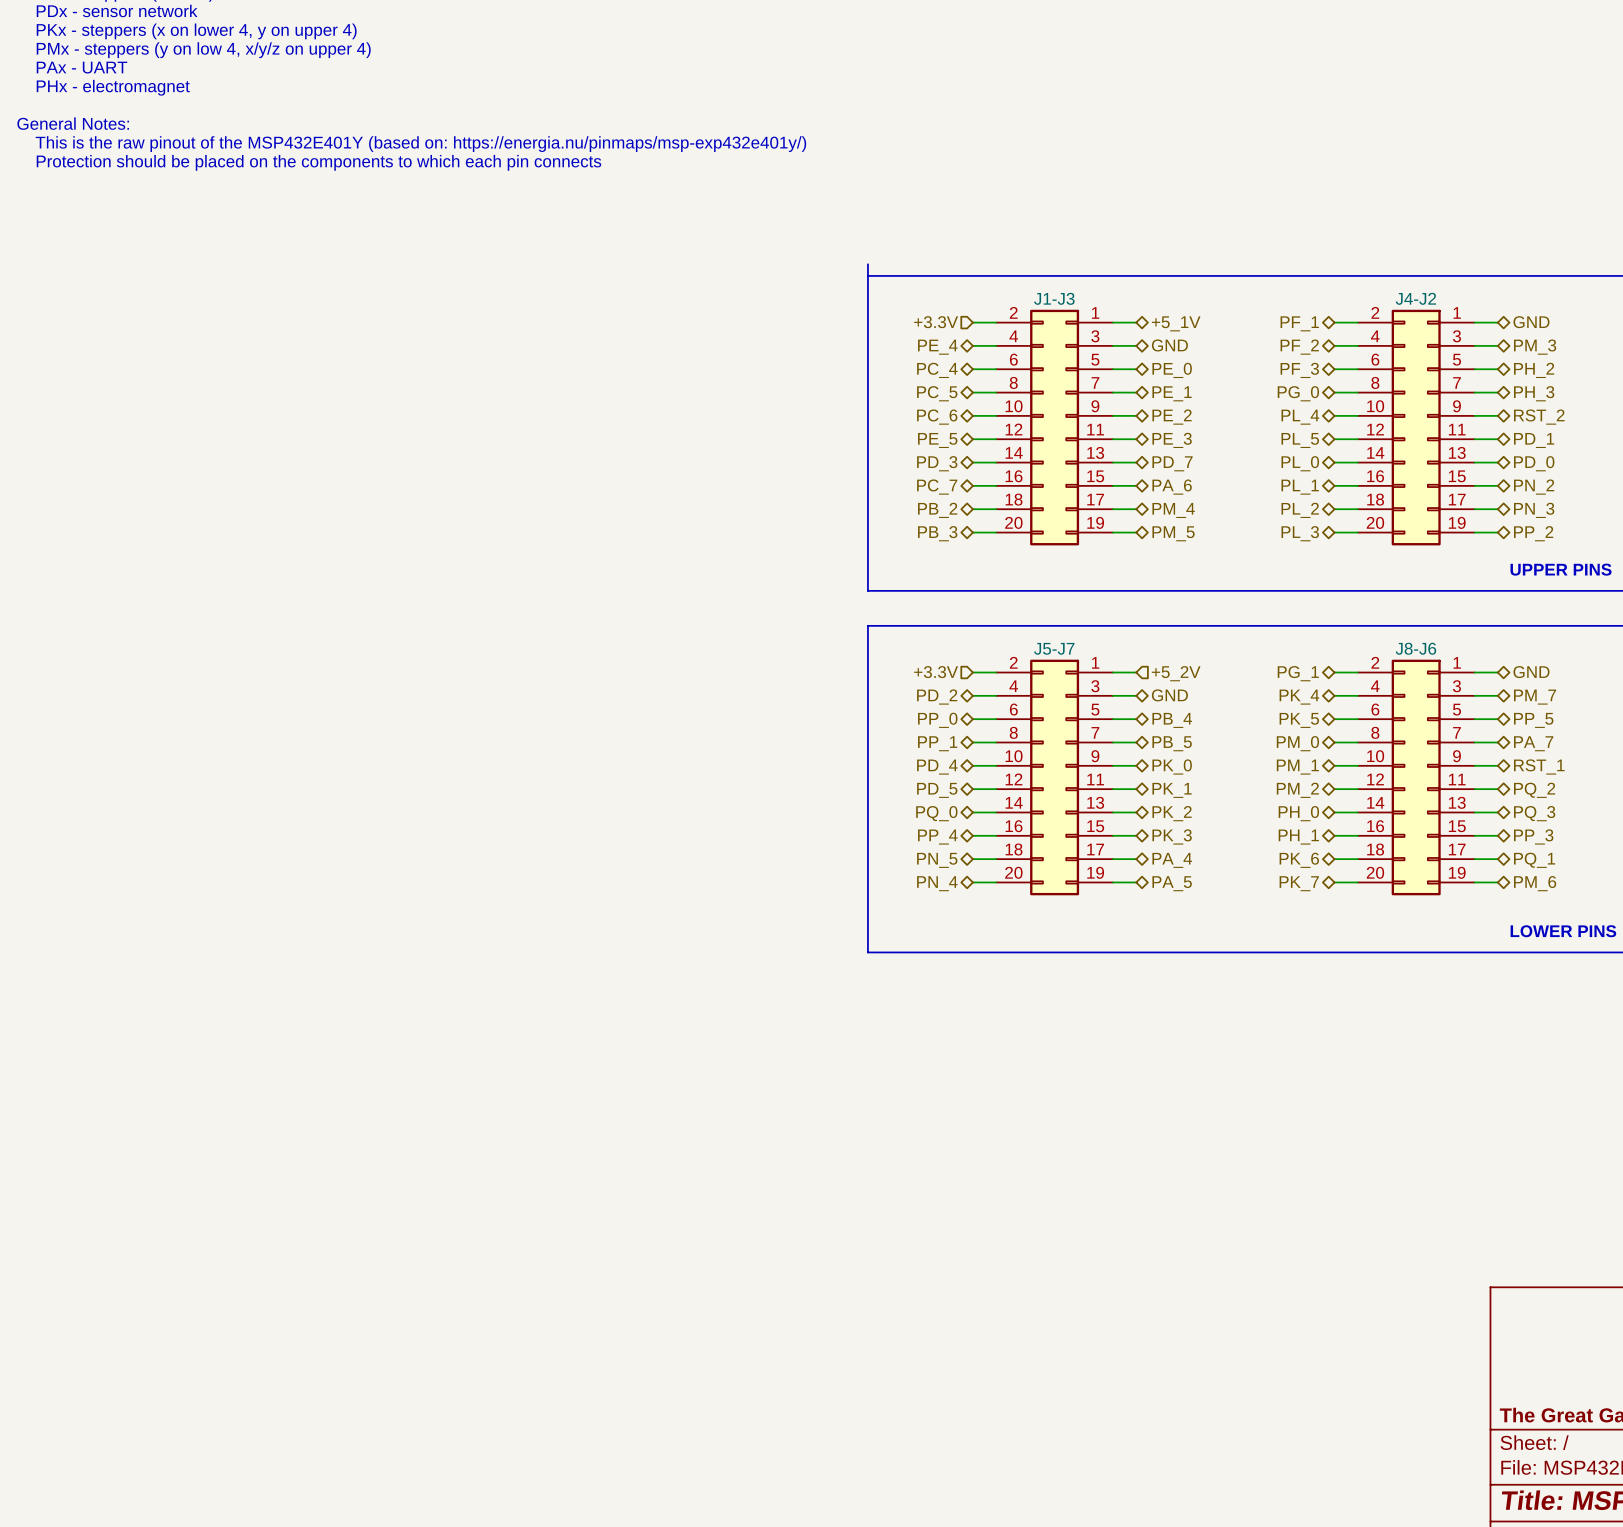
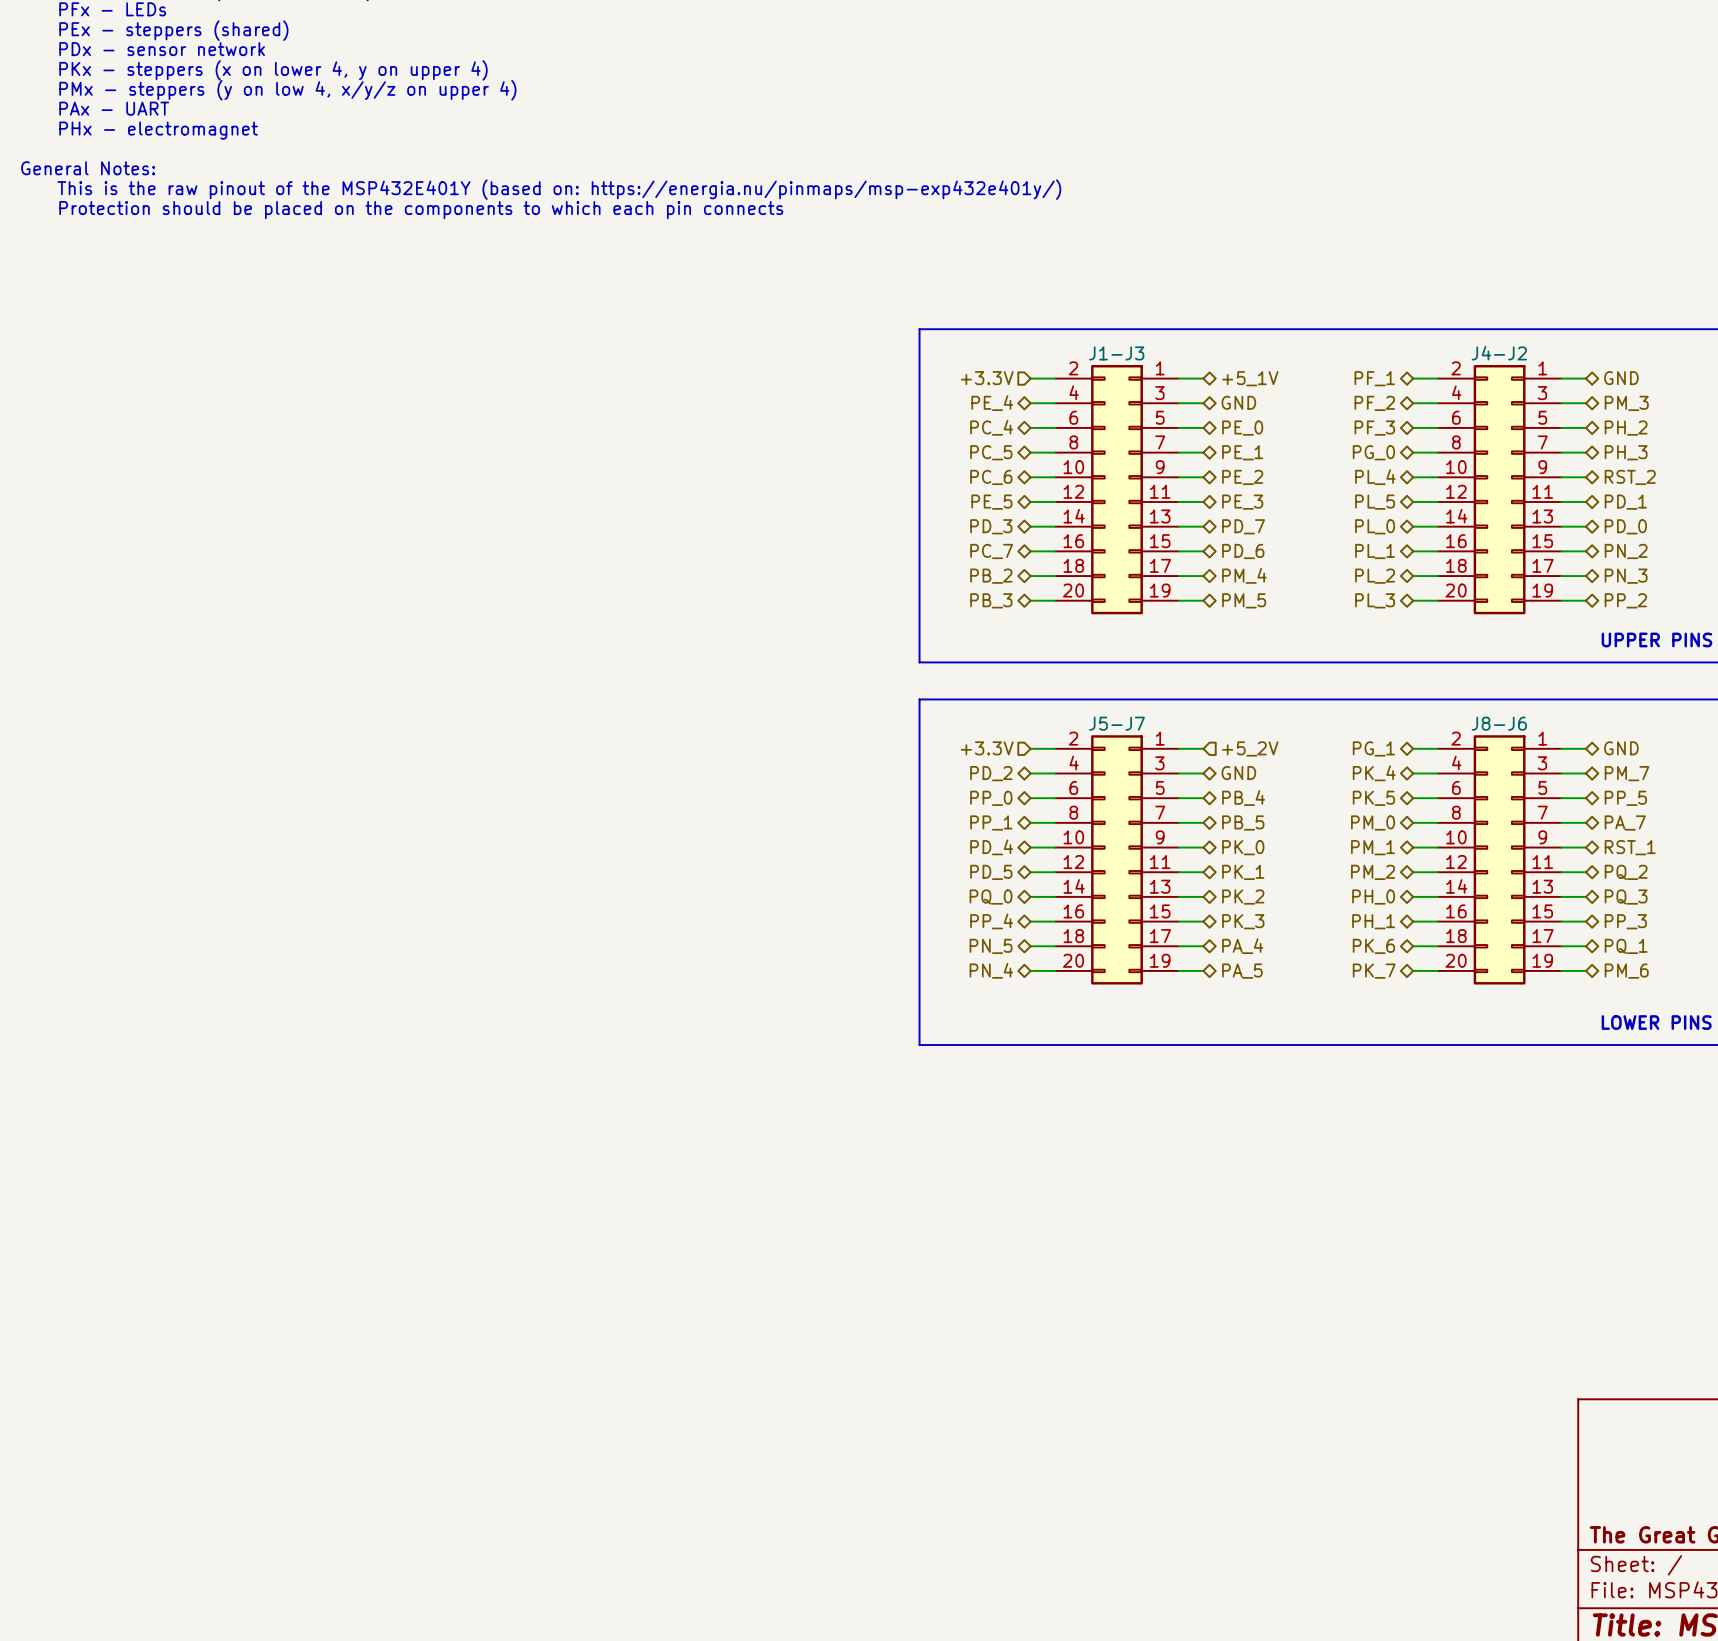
line: (867, 264) (867, 275) -> none
hierarchical label: PA_6 (1172, 487) -> PD_6 (1243, 551)

